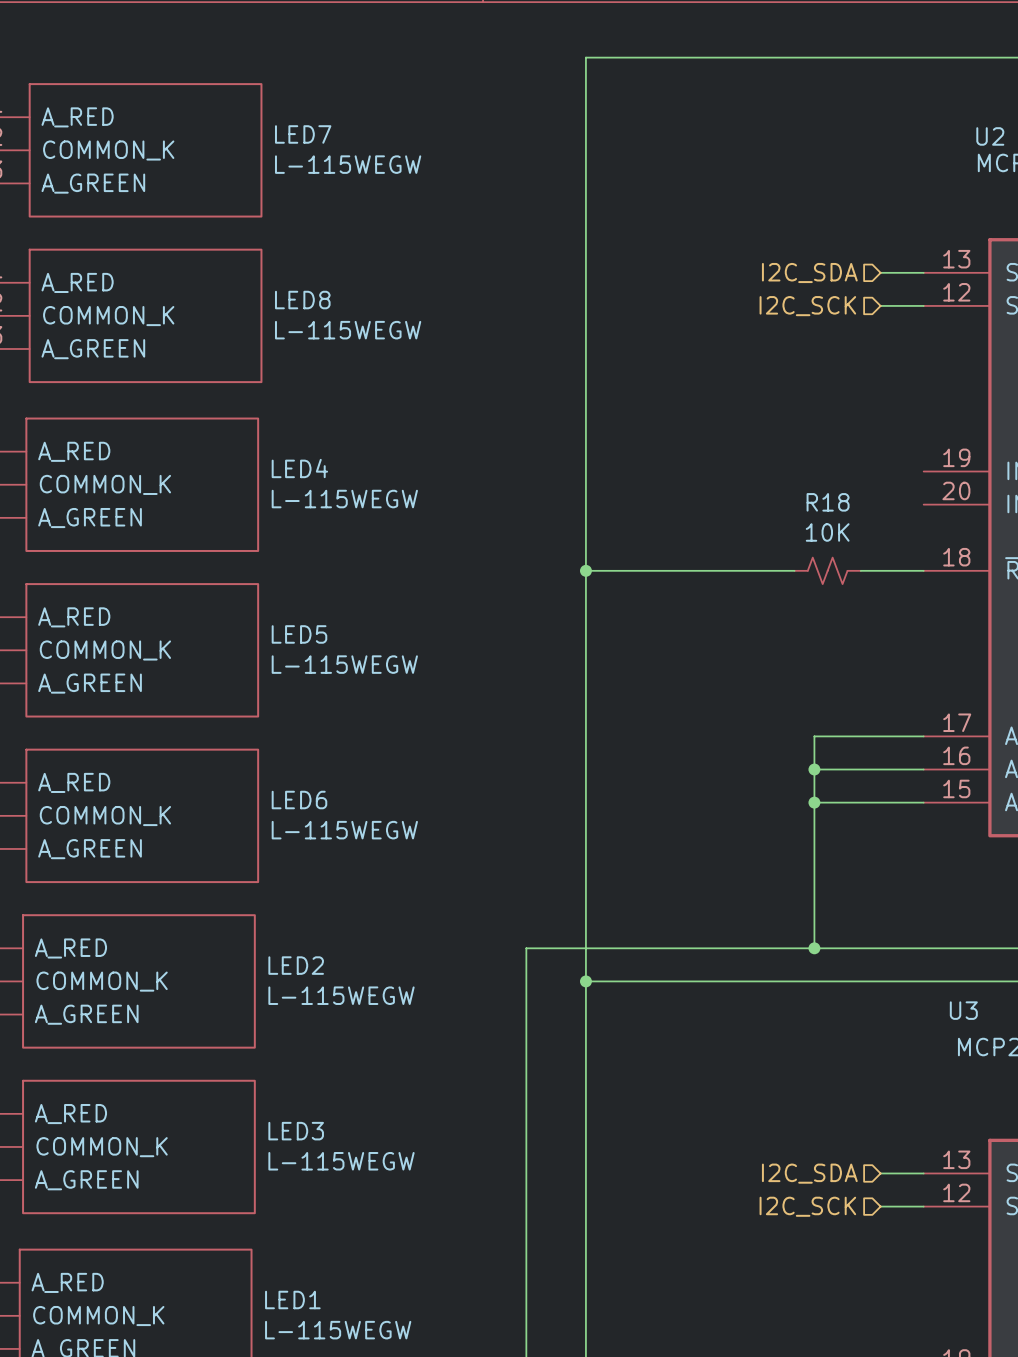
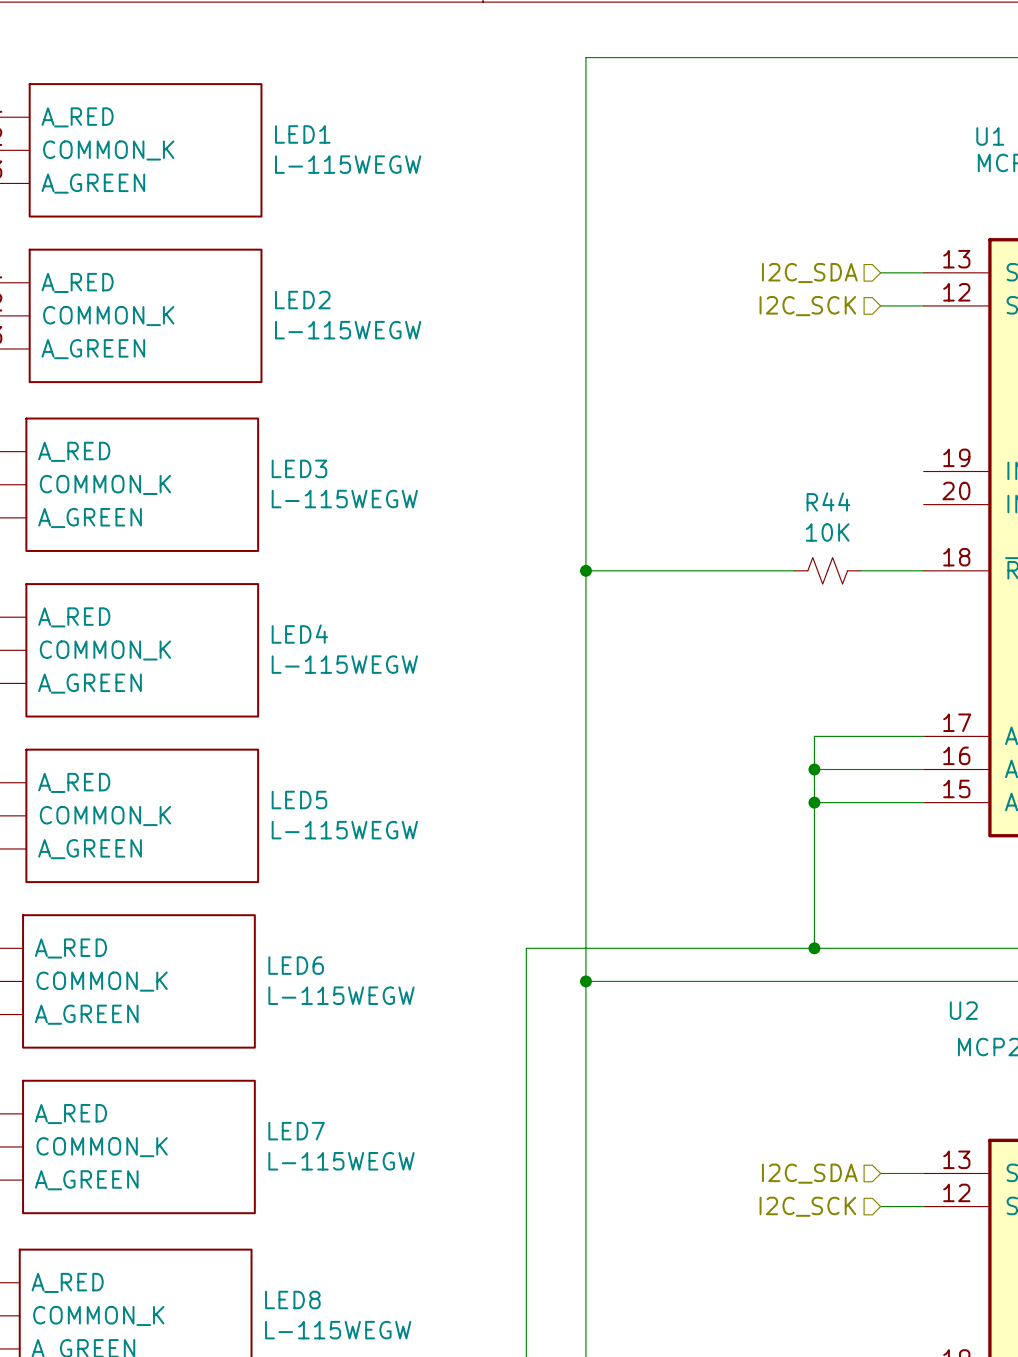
LED7 name: LED7 (303, 134) -> LED1 (302, 134)
U2 name: U2 (990, 136) -> U1 (990, 136)
LED8 name: LED8 (302, 300) -> LED2 (302, 300)
LED4 name: LED4 (299, 468) -> LED3 (299, 468)
R18 name: R18 (828, 502) -> R44 (828, 501)
LED5 name: LED5 (299, 634) -> LED4 (299, 634)
LED6 name: LED6 (299, 800) -> LED5 (299, 800)
LED2 name: LED2 (296, 965) -> LED6 (296, 965)
U3 name: U3 (963, 1010) -> U2 (963, 1010)
LED3 name: LED3 (296, 1131) -> LED7 (296, 1131)
LED1 name: LED1 (292, 1300) -> LED8 (292, 1300)

